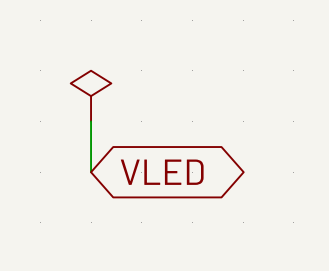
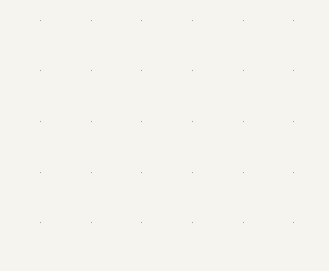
power symbol: (91, 96) -> none
wire: (91, 121) (91, 172) -> none
global label: VLED (162, 172) -> none

